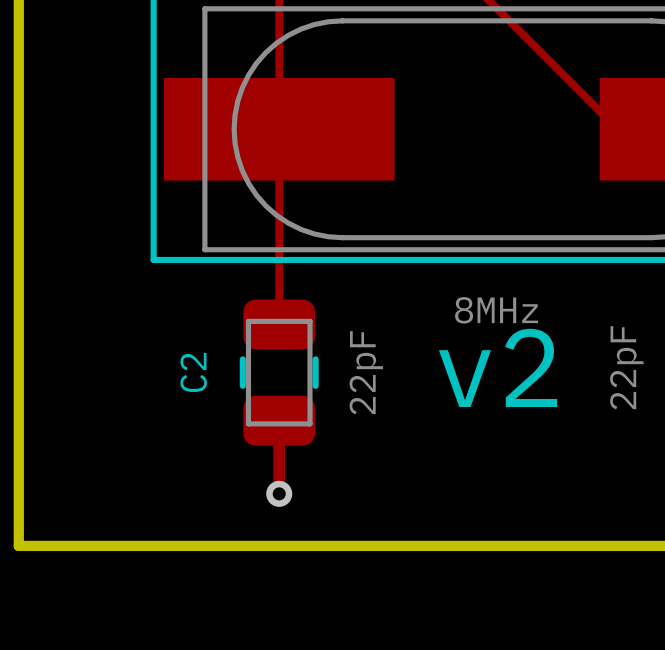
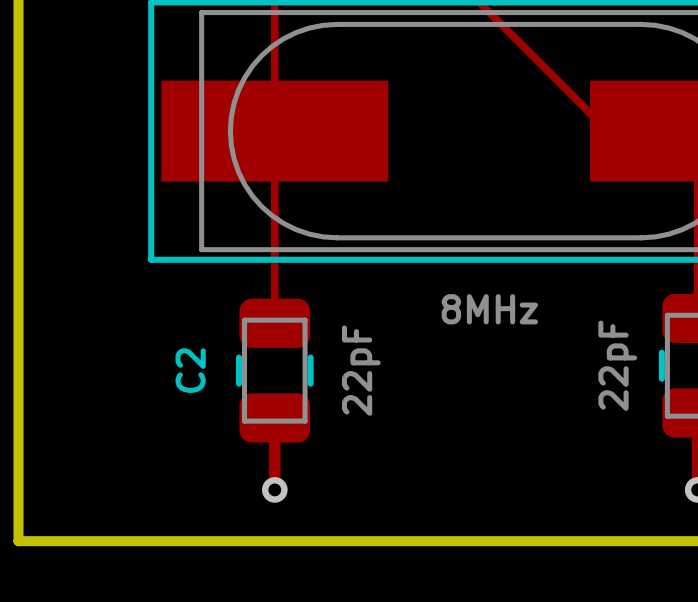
text: v2 (498, 367) -> none

